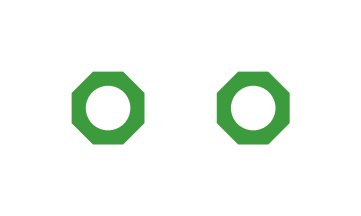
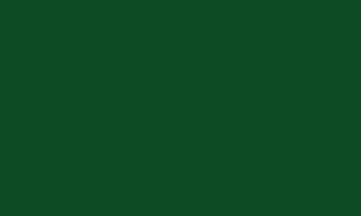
part: (108, 108) -> none
part: (253, 108) -> none

